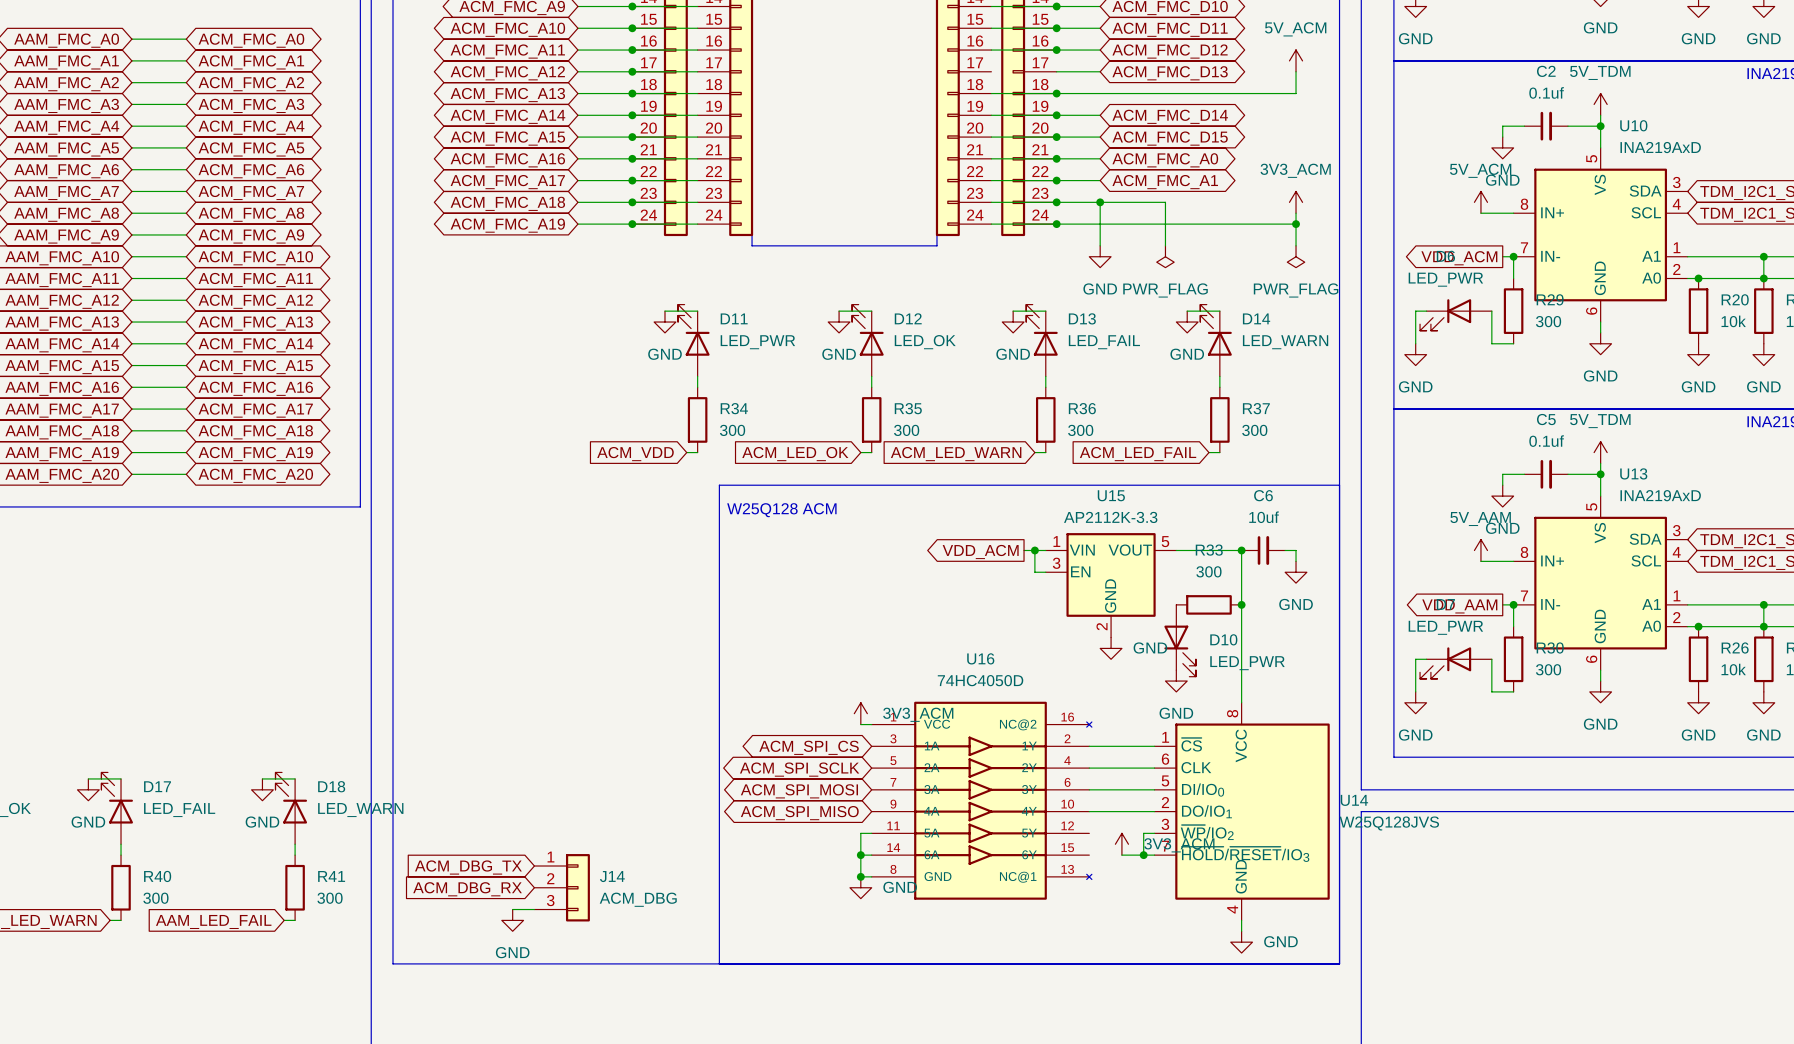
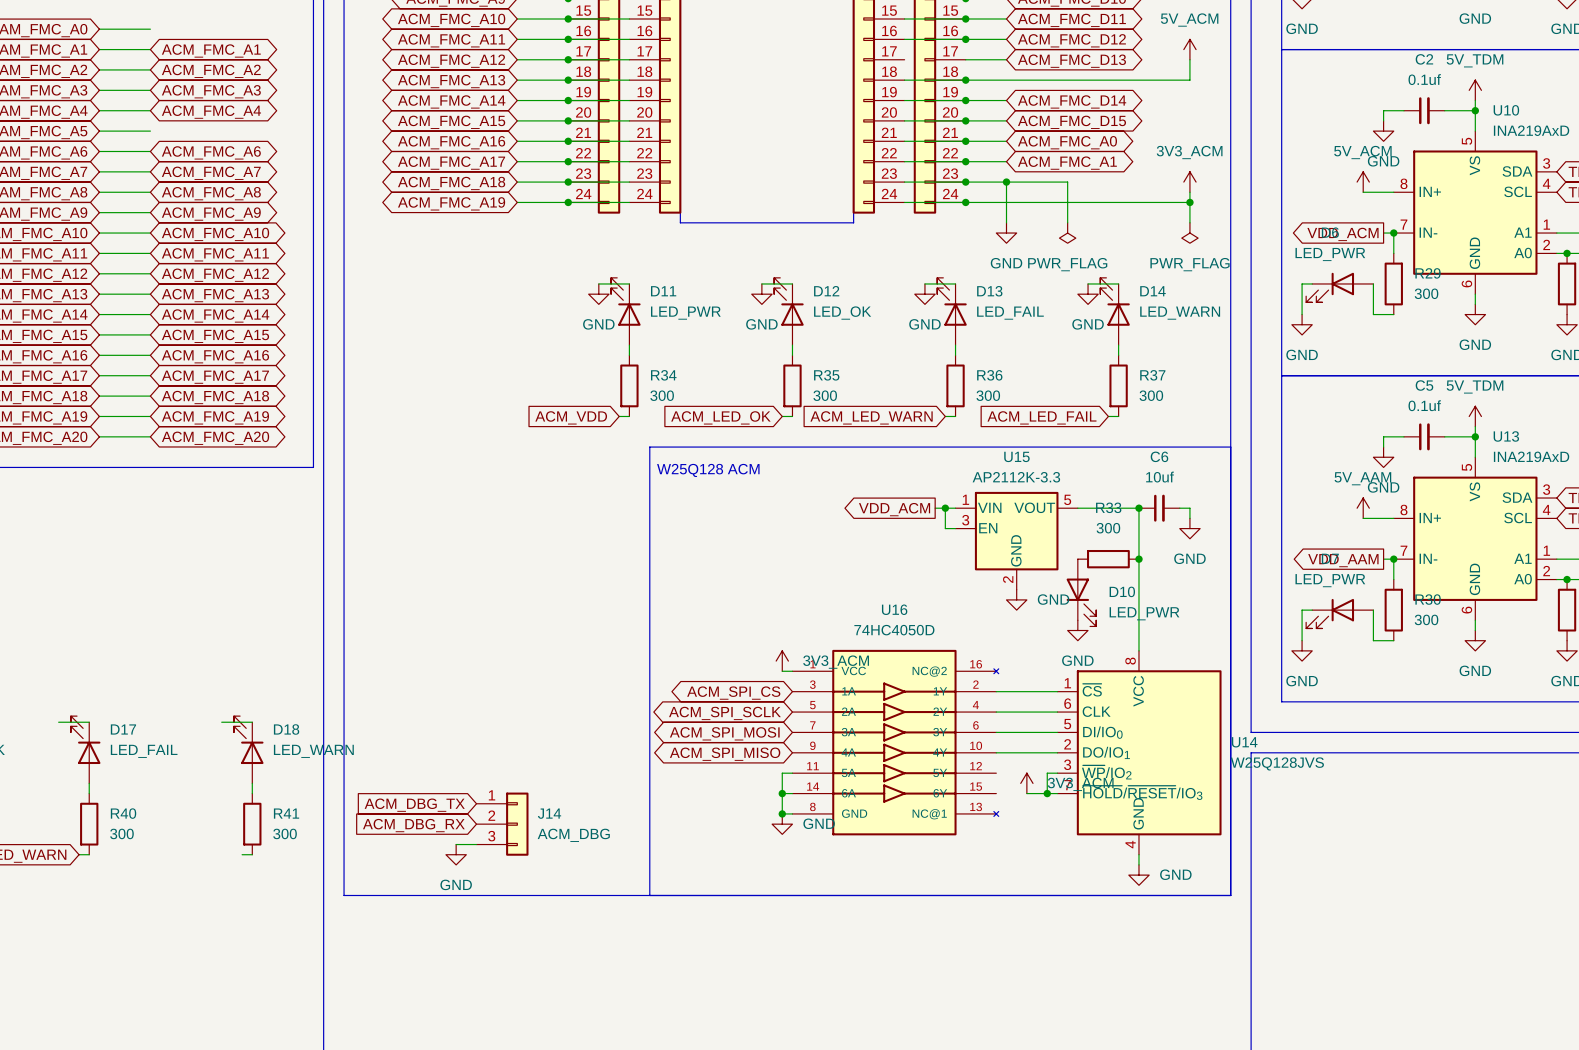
global label: ACM_FMC_A0 (251, 40) -> none
global label: ACM_FMC_A5 (251, 149) -> none
power symbol: GND (88, 789) -> none
power symbol: GND (262, 789) -> none
global label: AAM_LED_FAIL (213, 921) -> none

